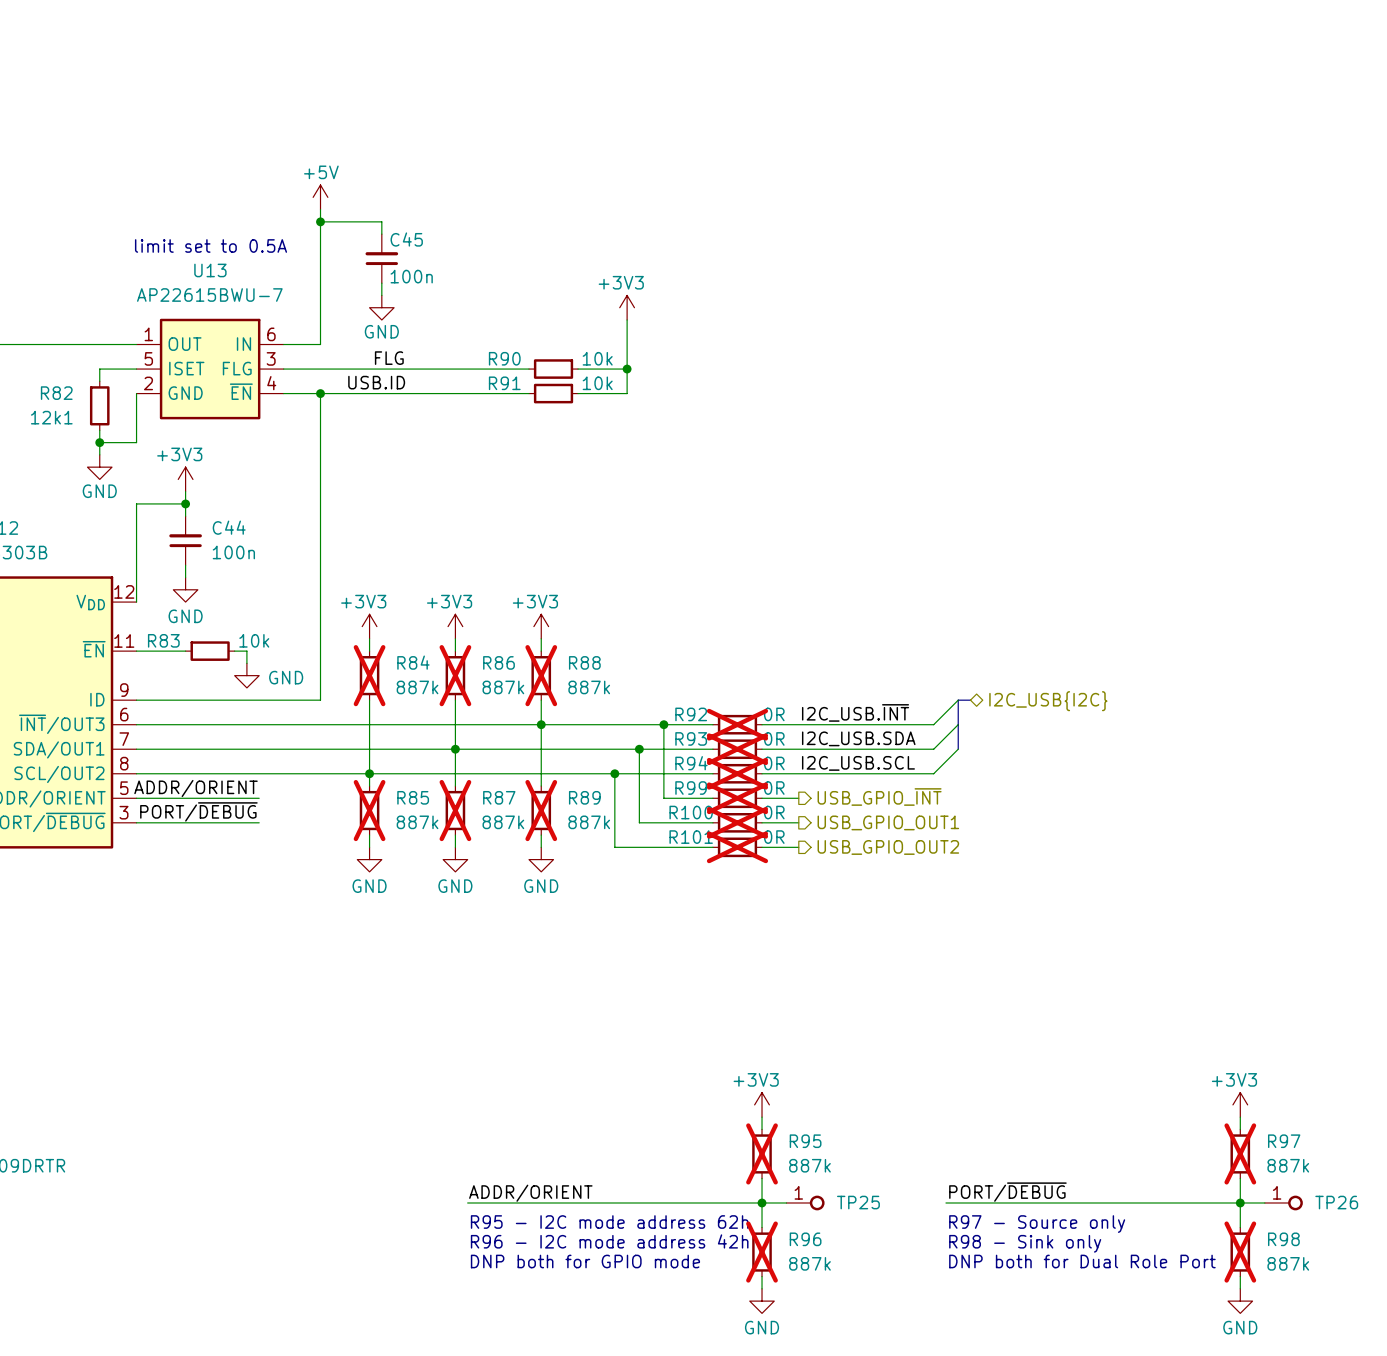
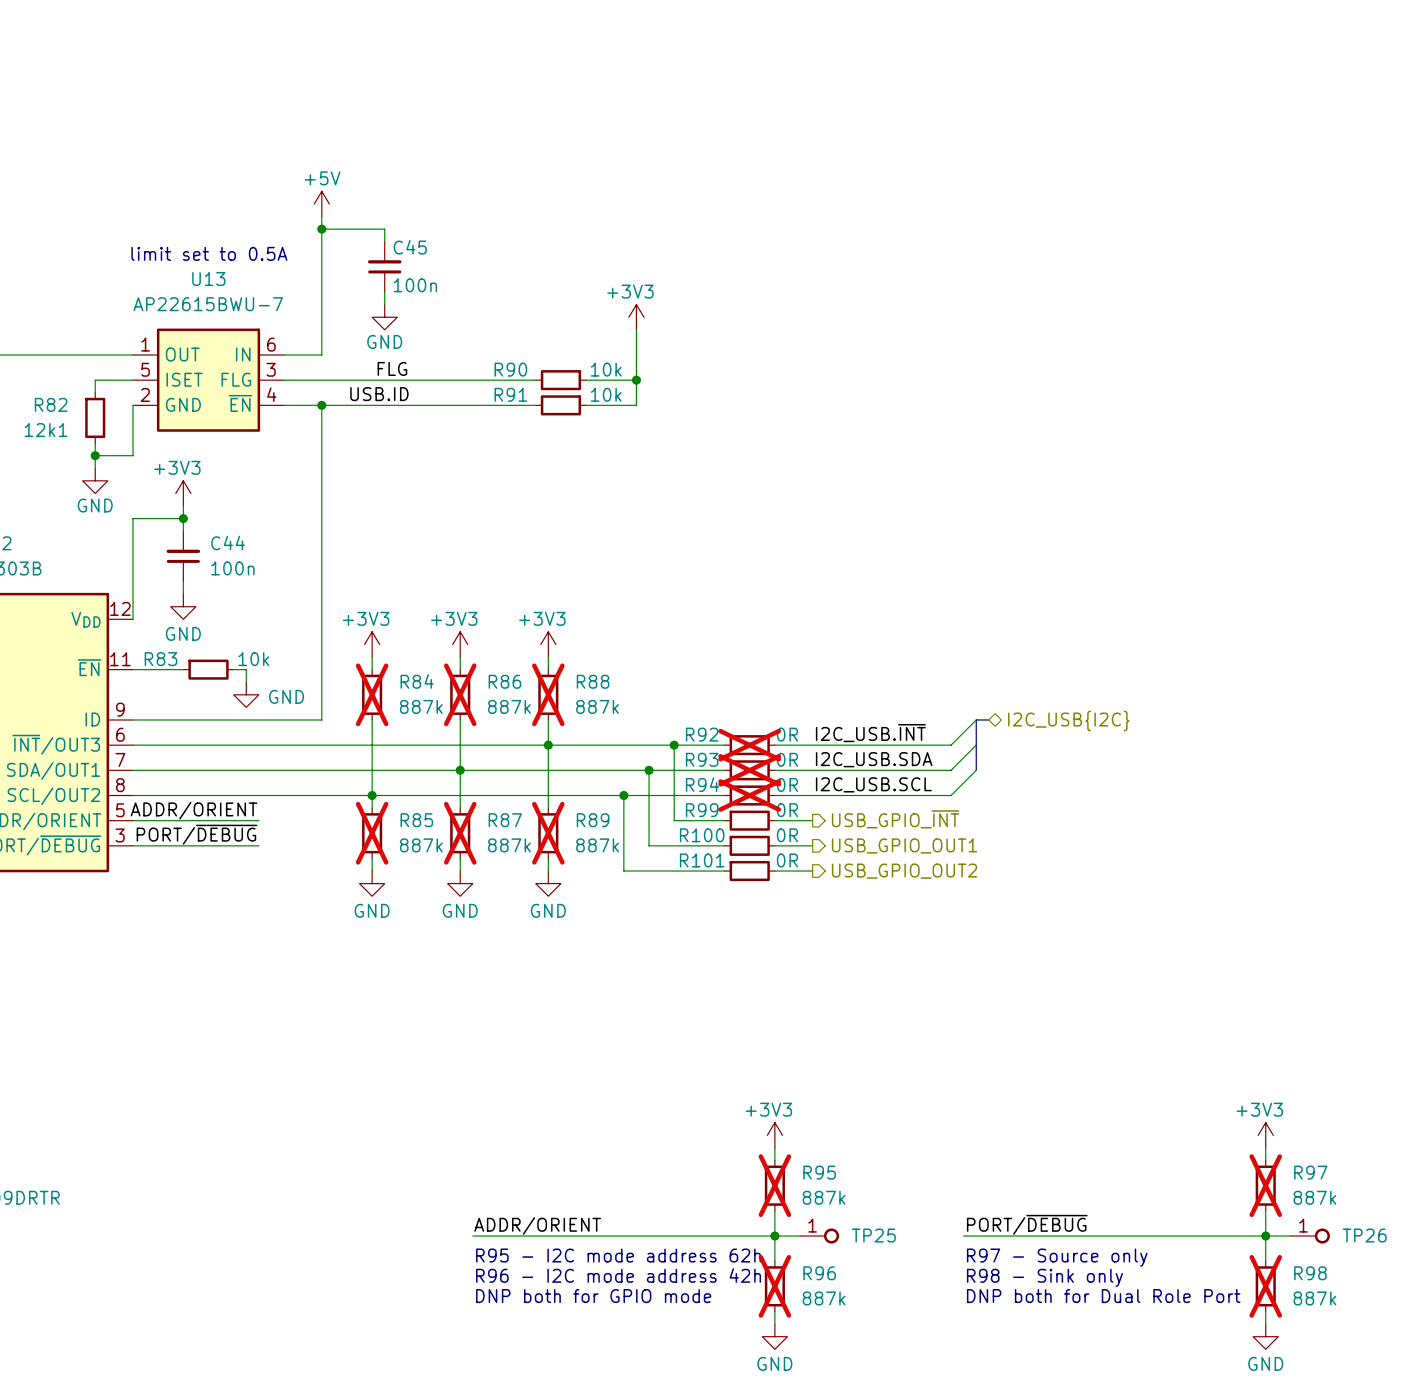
R99 do-not-place cross: (737, 798) -> none
R100 do-not-place cross: (737, 822) -> none
R101 do-not-place cross: (737, 847) -> none

